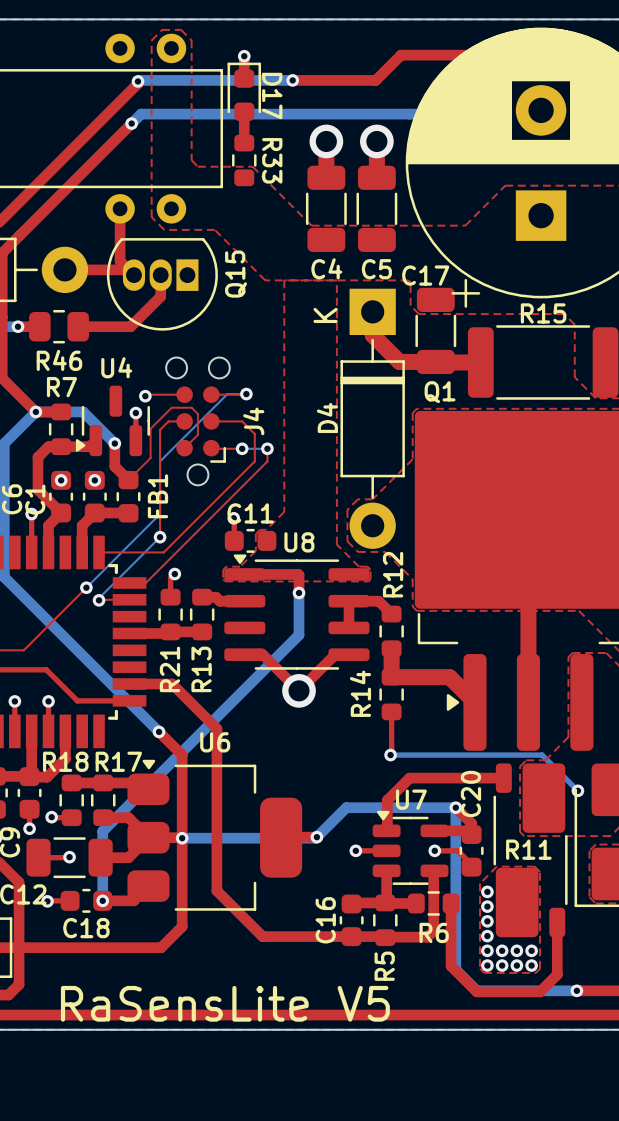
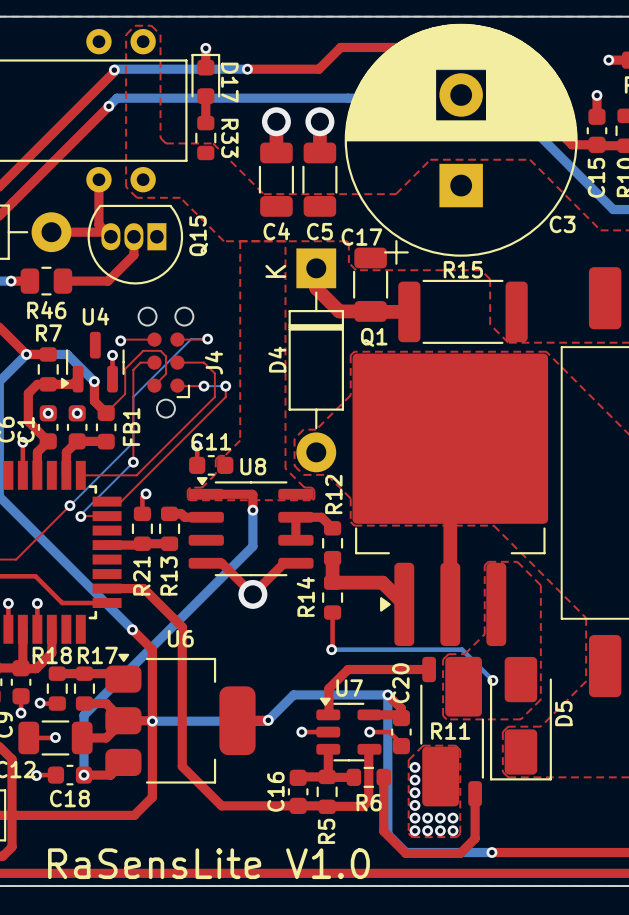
text: RaSensLite V5 (225, 1003) -> RaSensLite V1.0 (208, 863)

